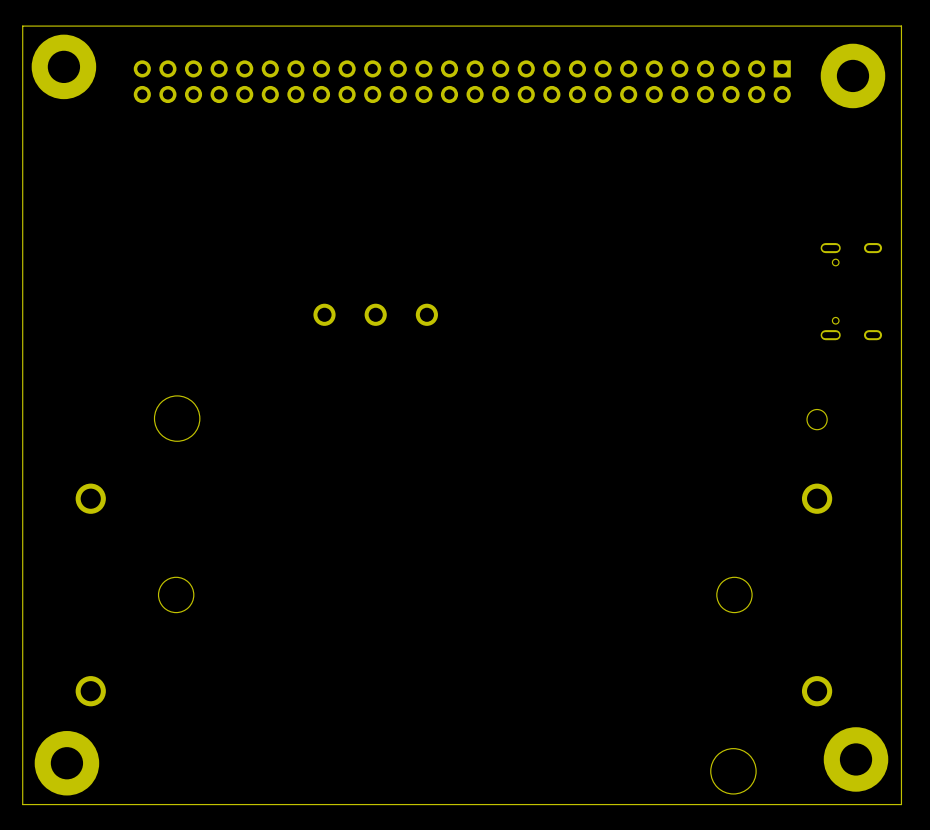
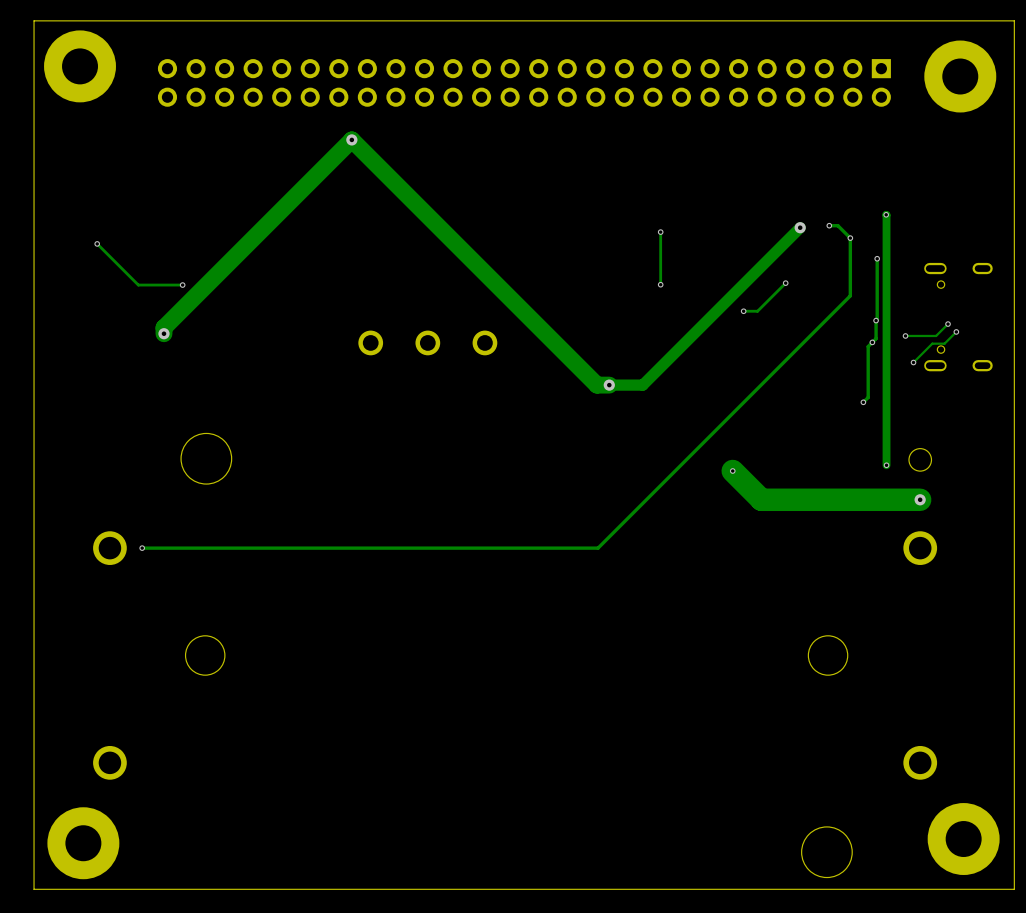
via: none -> (351, 139)
track: none -> (886, 214) (886, 465)
via: none -> (886, 214)
track: none -> (829, 225) (837, 225) (850, 238) (850, 295) (598, 548) (142, 548)
via: none -> (829, 225)
track: none -> (800, 227) (642, 385) (597, 385) (351, 139) (163, 327) (163, 333)
via: none -> (800, 227)
track: none -> (660, 232) (660, 284)
via: none -> (660, 232)
via: none -> (850, 238)
track: none -> (97, 243) (138, 285) (182, 285)
via: none -> (97, 243)
track: none -> (877, 258) (876, 338) (868, 346) (868, 397) (863, 402)
via: none -> (877, 258)
track: none -> (785, 283) (757, 311) (743, 311)
via: none -> (785, 283)
via: none -> (182, 285)
via: none -> (660, 284)
via: none -> (743, 311)
via: none -> (876, 320)
track: none -> (948, 324) (936, 335) (905, 335)
via: none -> (948, 324)
track: none -> (956, 331) (944, 343) (932, 343) (913, 362)
via: none -> (956, 331)
via: none -> (163, 333)
via: none -> (905, 335)
via: none -> (872, 342)
via: none -> (913, 362)
via: none -> (609, 385)
via: none -> (863, 402)
via: none -> (886, 465)
track: none -> (732, 471) (761, 499) (920, 499)
via: none -> (732, 471)
via: none -> (920, 499)
via: none -> (142, 548)

